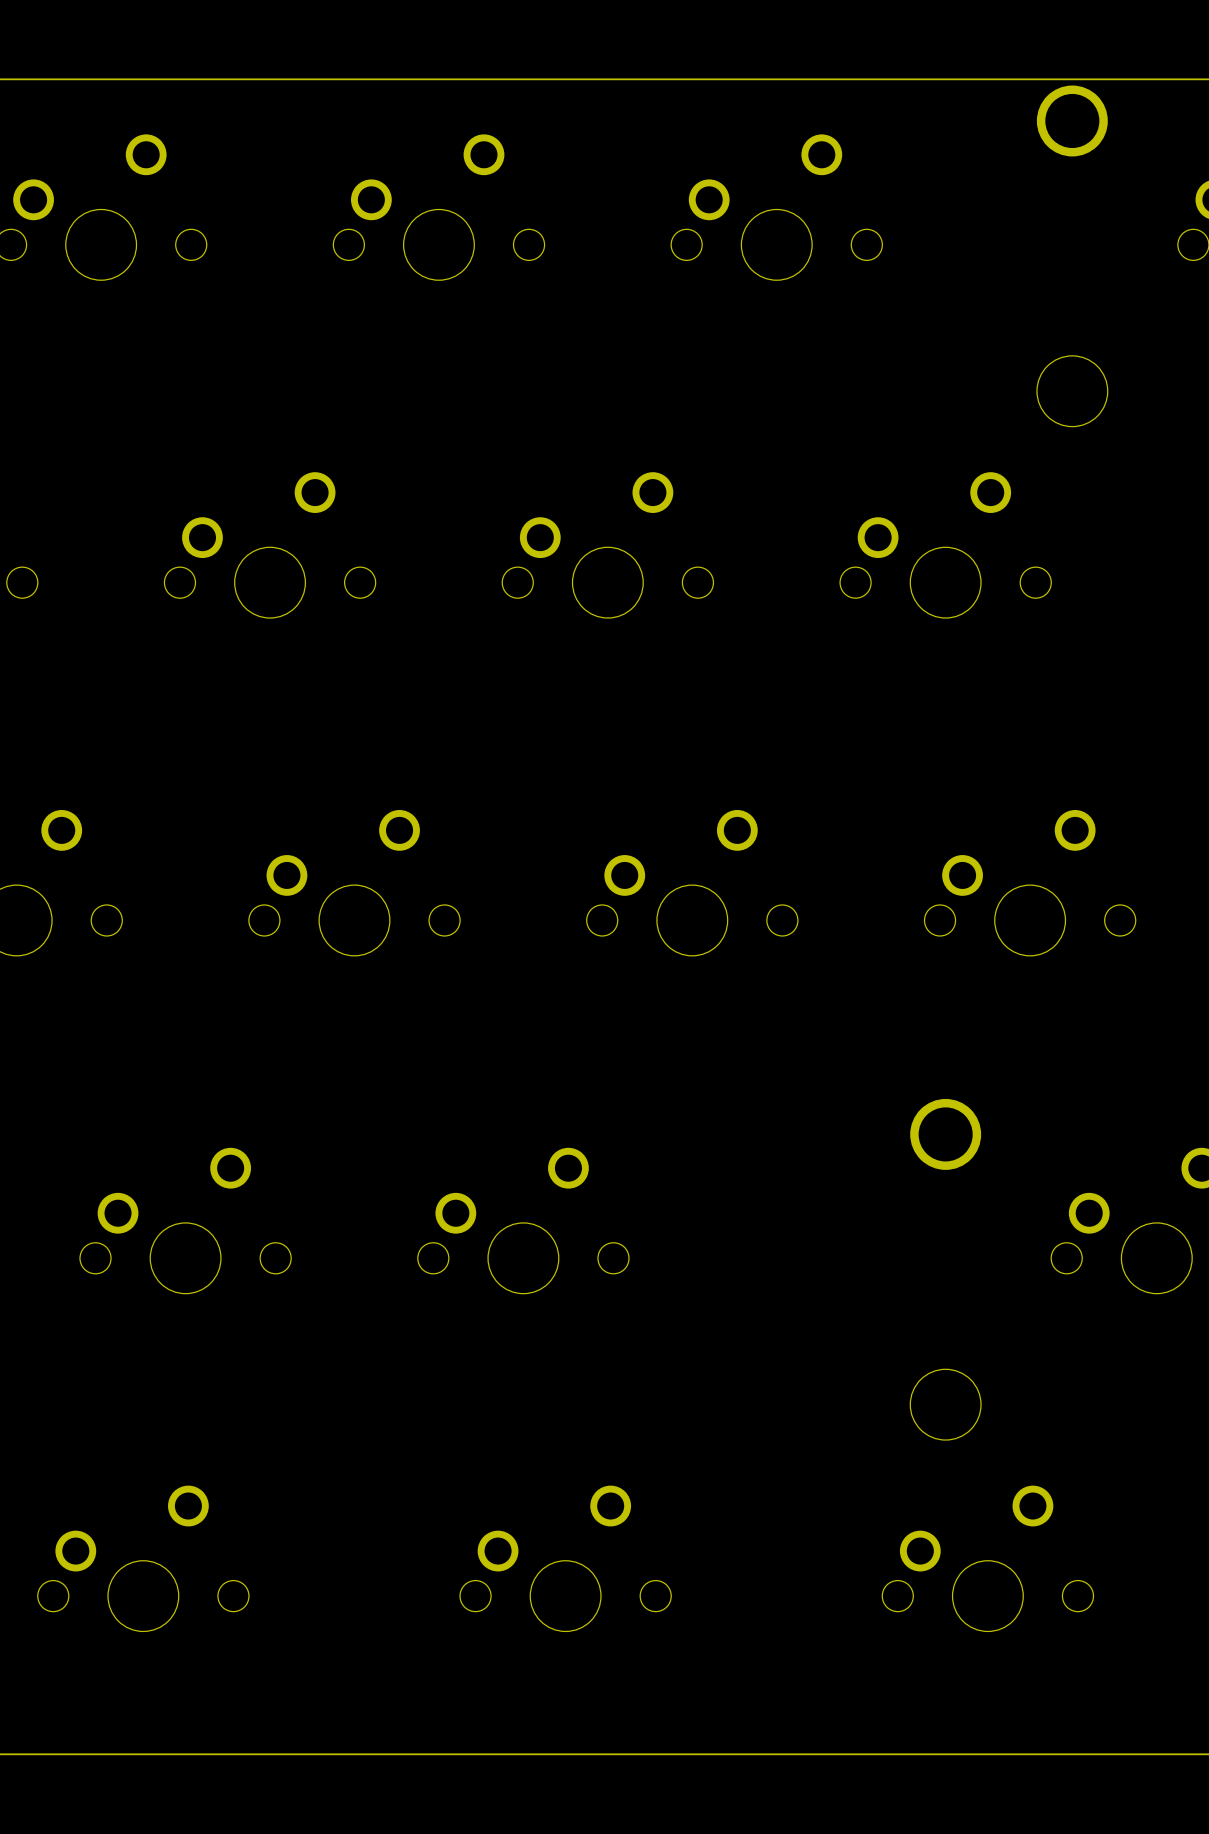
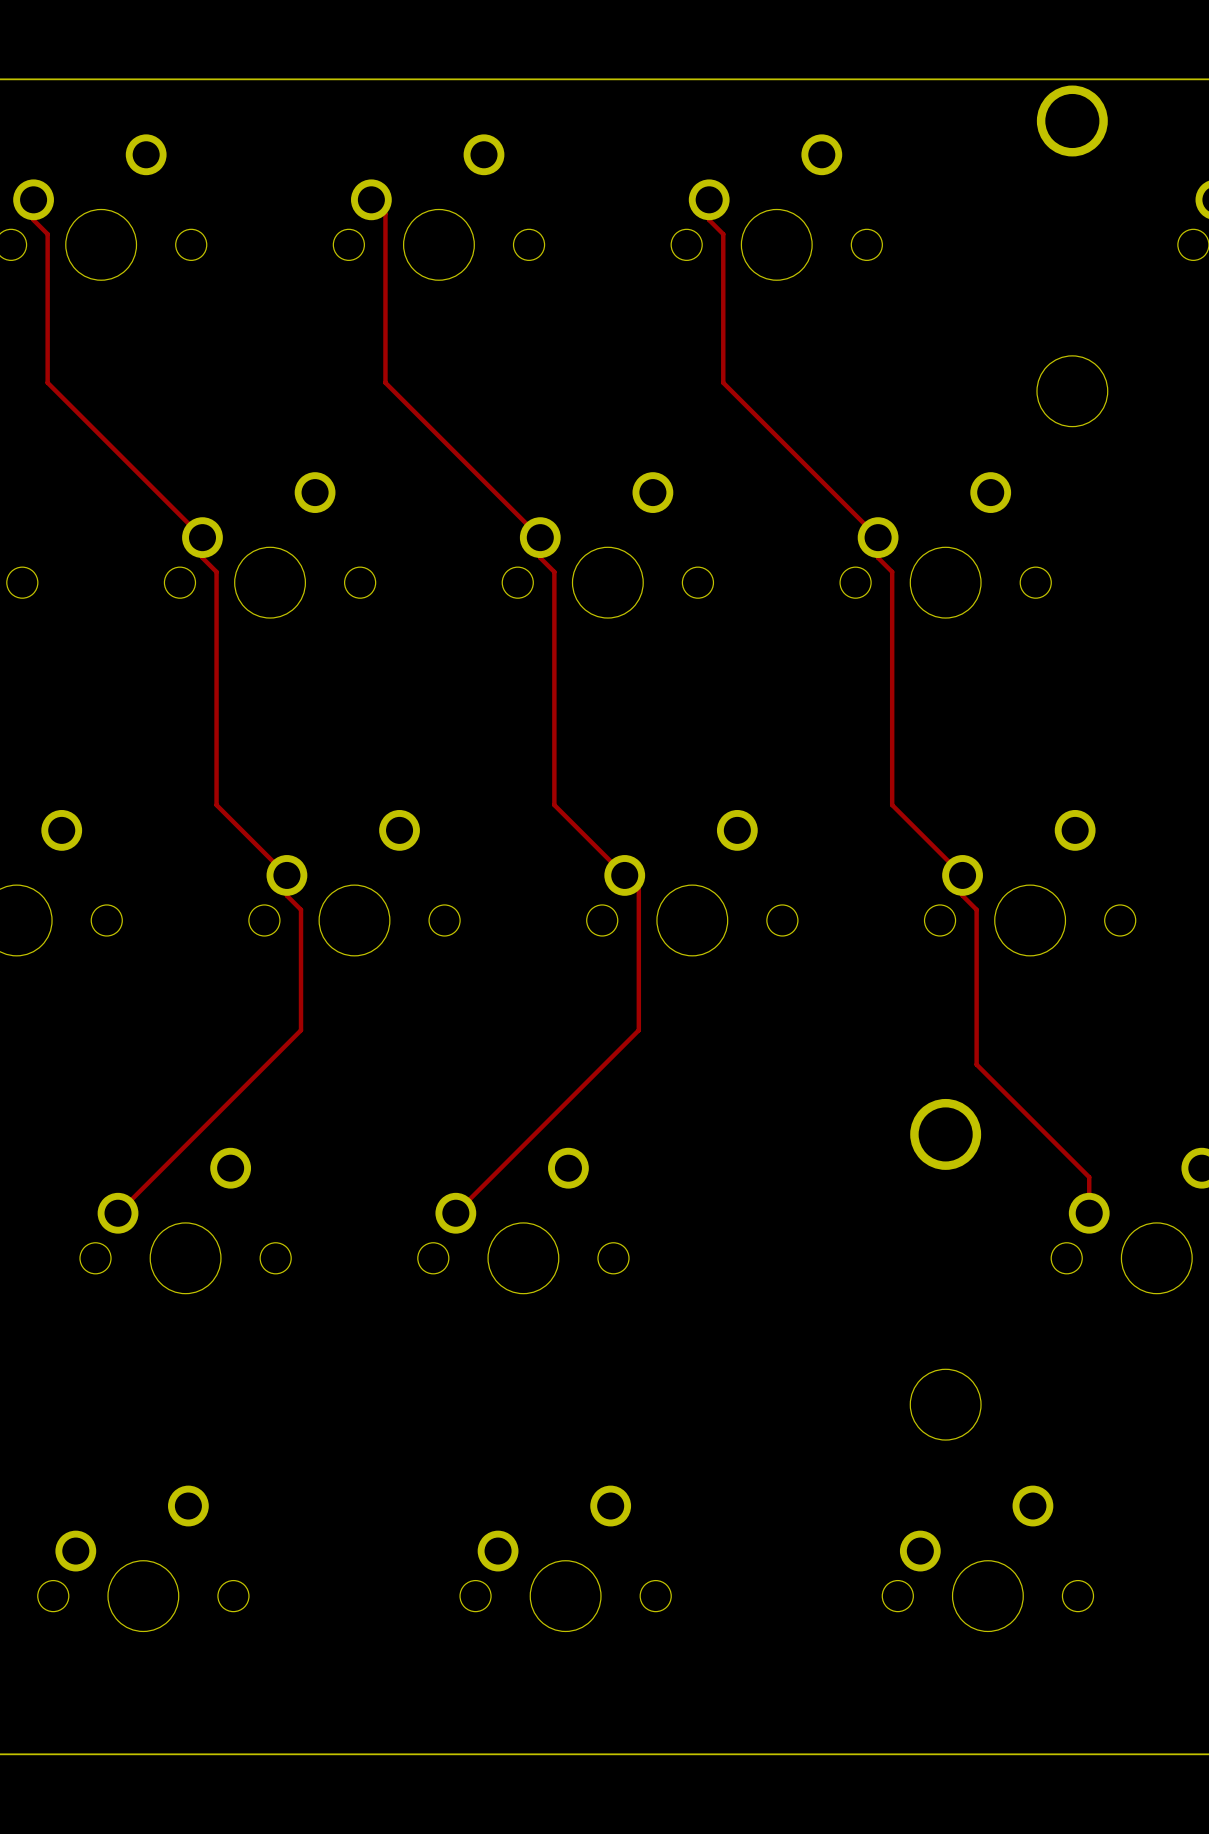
track: none -> (33, 199) (33, 220) (47, 234) (47, 382) (202, 537) (202, 557) (216, 571) (216, 805) (286, 875) (286, 895) (301, 909) (301, 1030) (118, 1213)
track: none -> (371, 199) (385, 213) (385, 382) (540, 537) (540, 557) (554, 571) (554, 805) (638, 889) (638, 1030) (455, 1213)
track: none -> (709, 199) (709, 220) (723, 234) (723, 382) (878, 537) (878, 557) (892, 571) (892, 805) (962, 875) (962, 895) (976, 909) (976, 1064) (1089, 1177) (1089, 1213)

